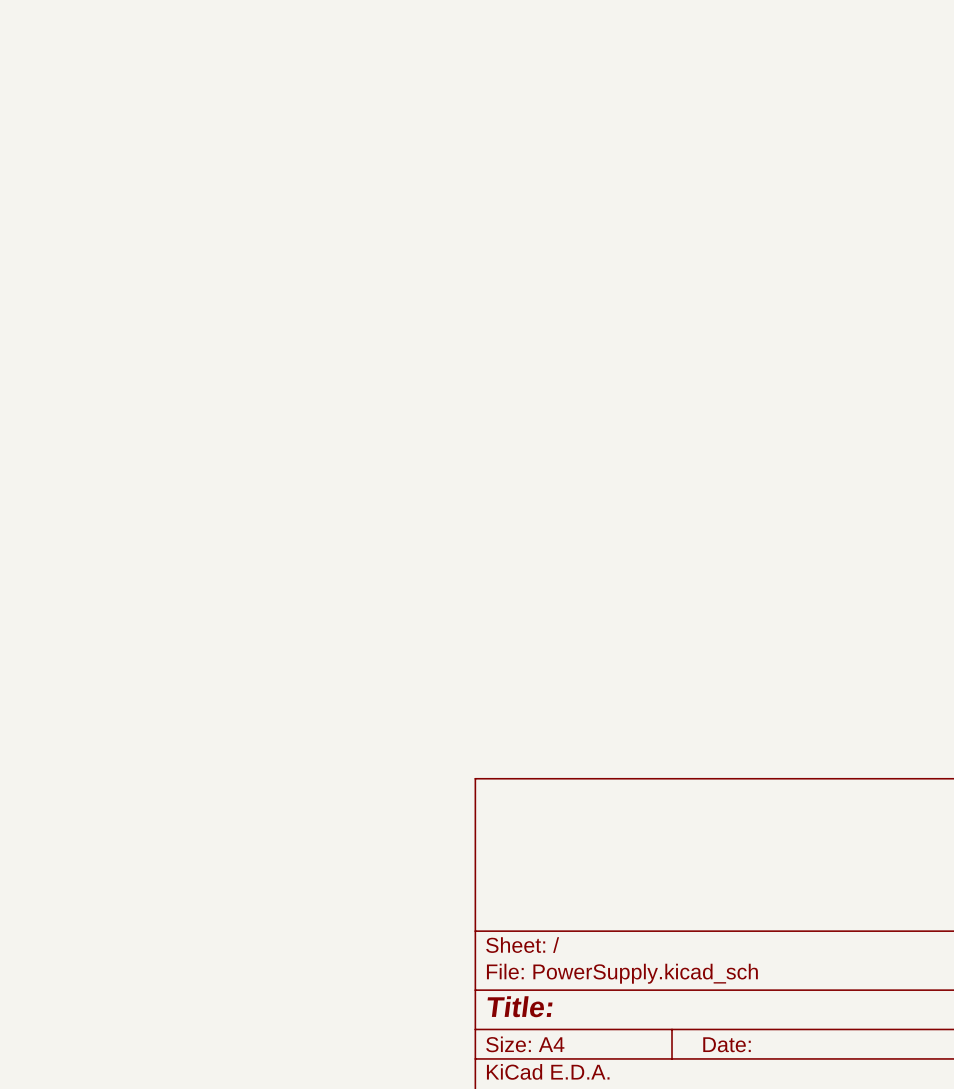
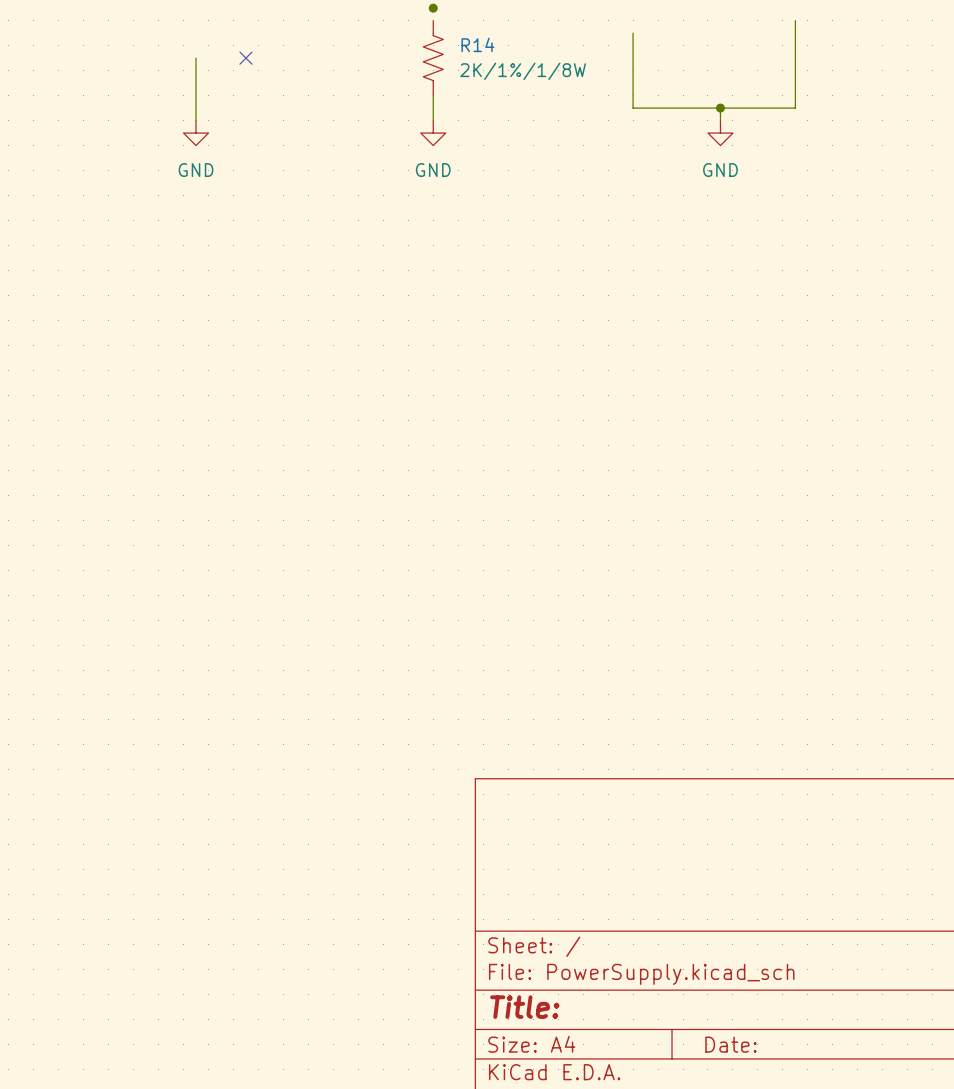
junction: none -> (433, 8)
wire: none -> (795, 20) (795, 108) (633, 108) (633, 33)
wire: none -> (196, 58) (196, 120)
no-connect mark: none -> (245, 58)
R14: none -> 2K/1%/1/8W (433, 58)
wire: none -> (433, 95) (433, 120)
wire: none -> (720, 108) (720, 120)
junction: none -> (720, 108)
power symbol: none -> GND (196, 133)
power symbol: none -> GND (433, 133)
power symbol: none -> GND (720, 133)

